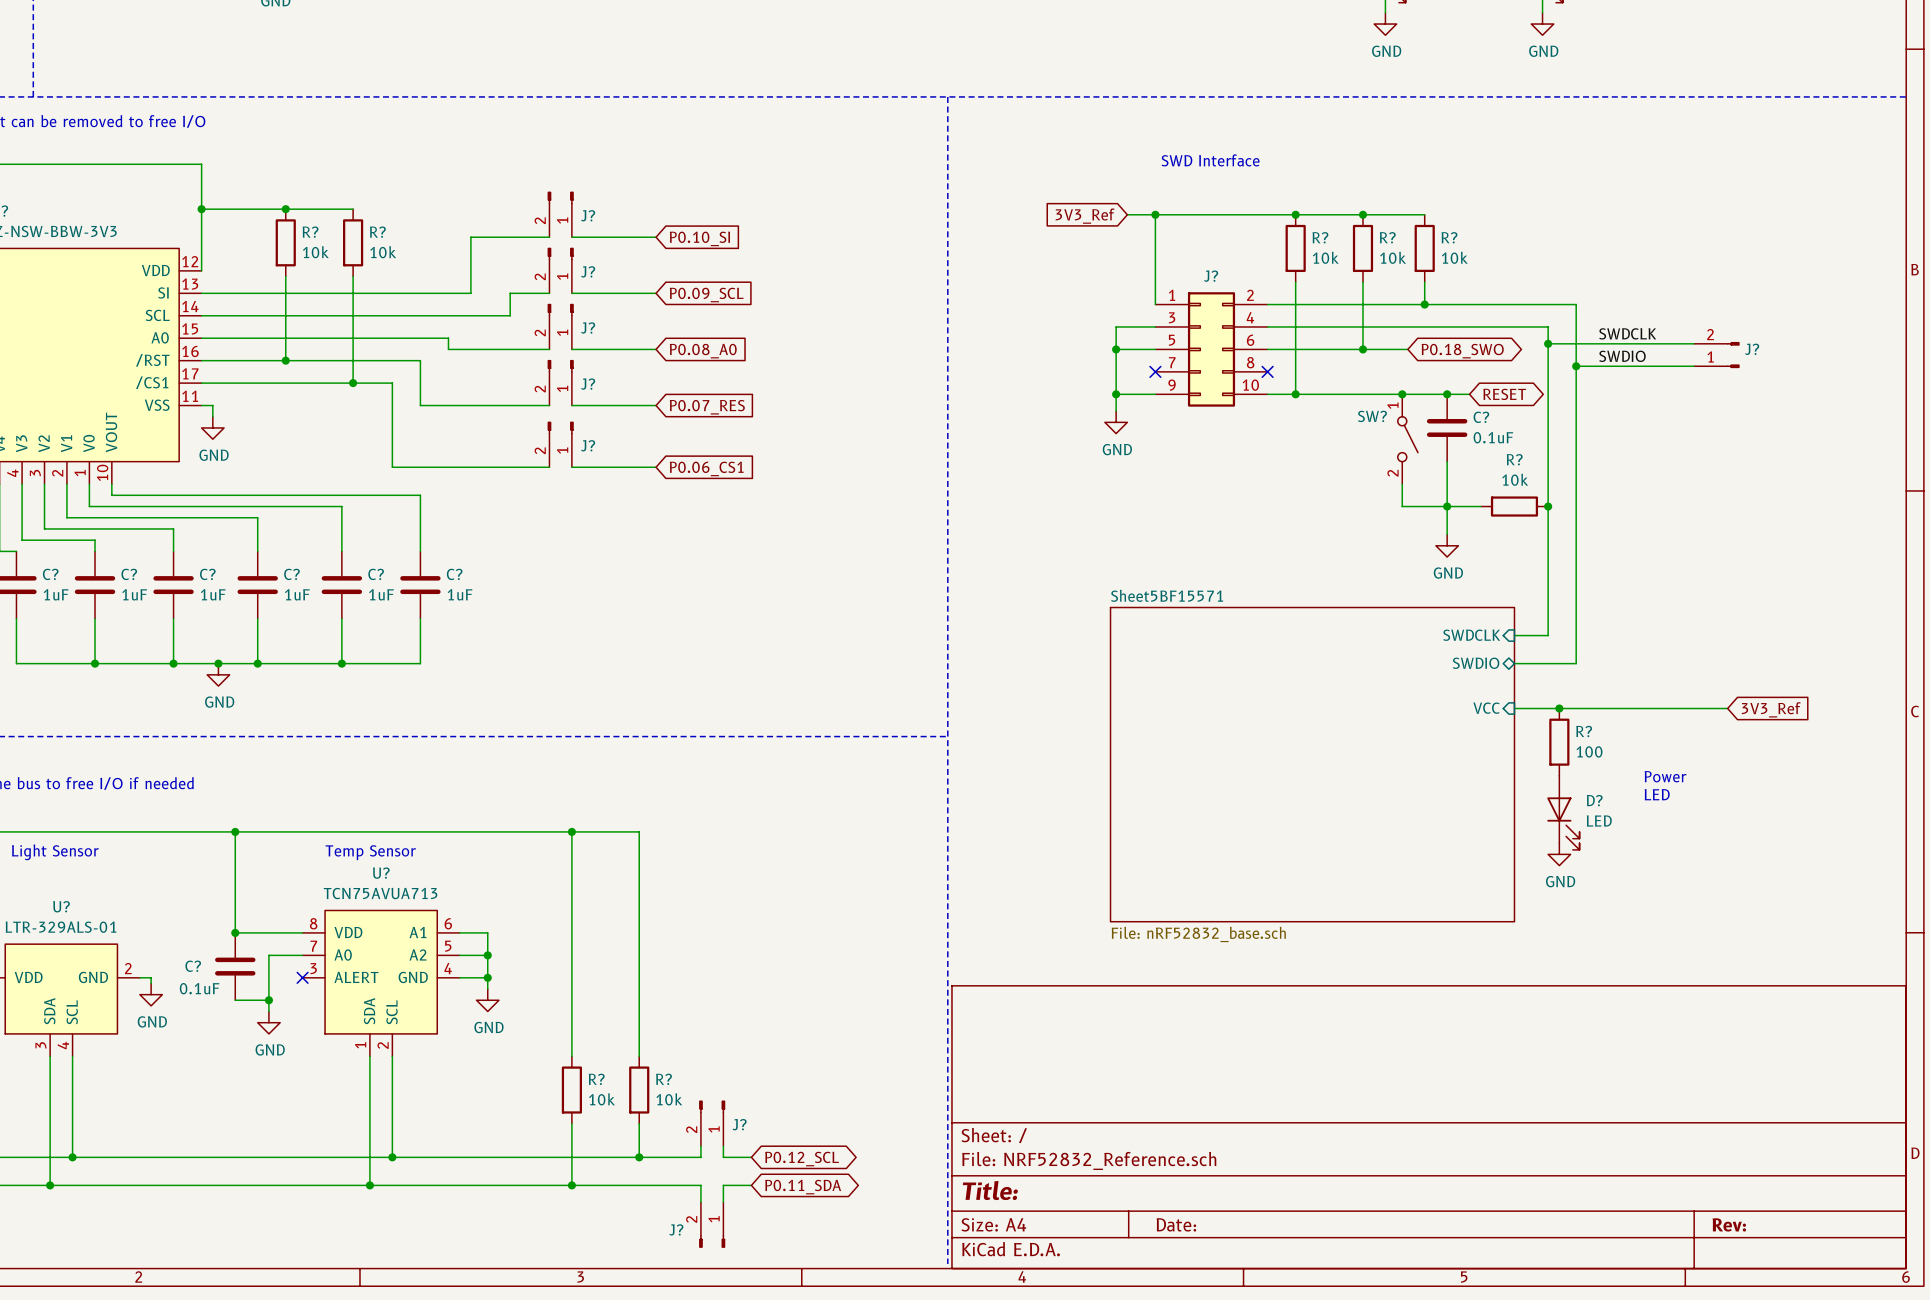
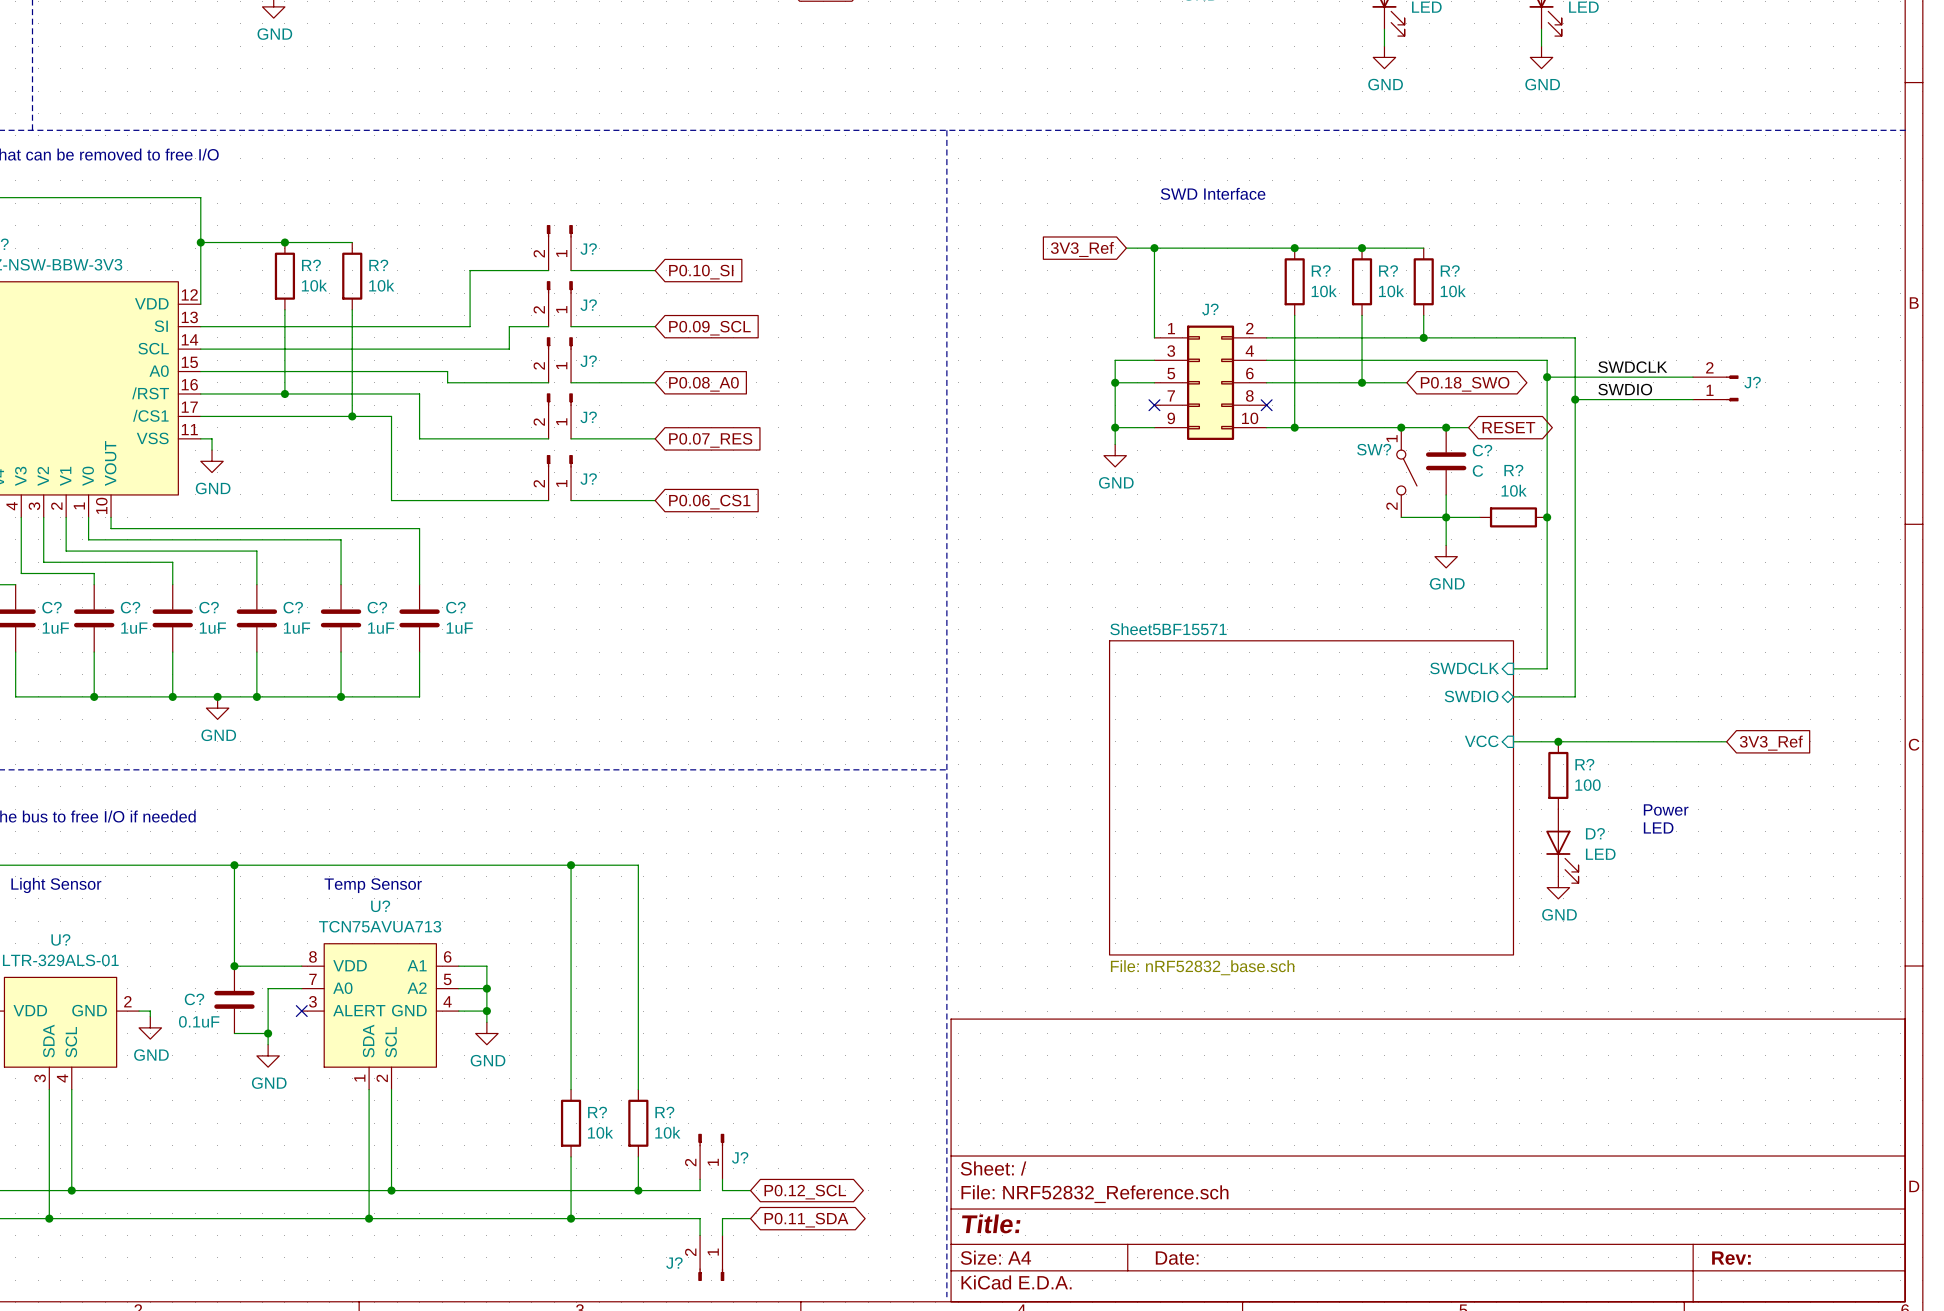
C? value: 0.1uF (1493, 437) -> C (1477, 470)
wire: (1402, 484) (1402, 506) (1480, 506) -> (1401, 517) (1479, 517)
junction position: (1447, 506) -> (1446, 517)
R? position: (1514, 506) -> (1513, 517)
junction position: (1548, 506) -> (1547, 517)
power symbol position: GND (1447, 545) -> GND (1446, 556)

